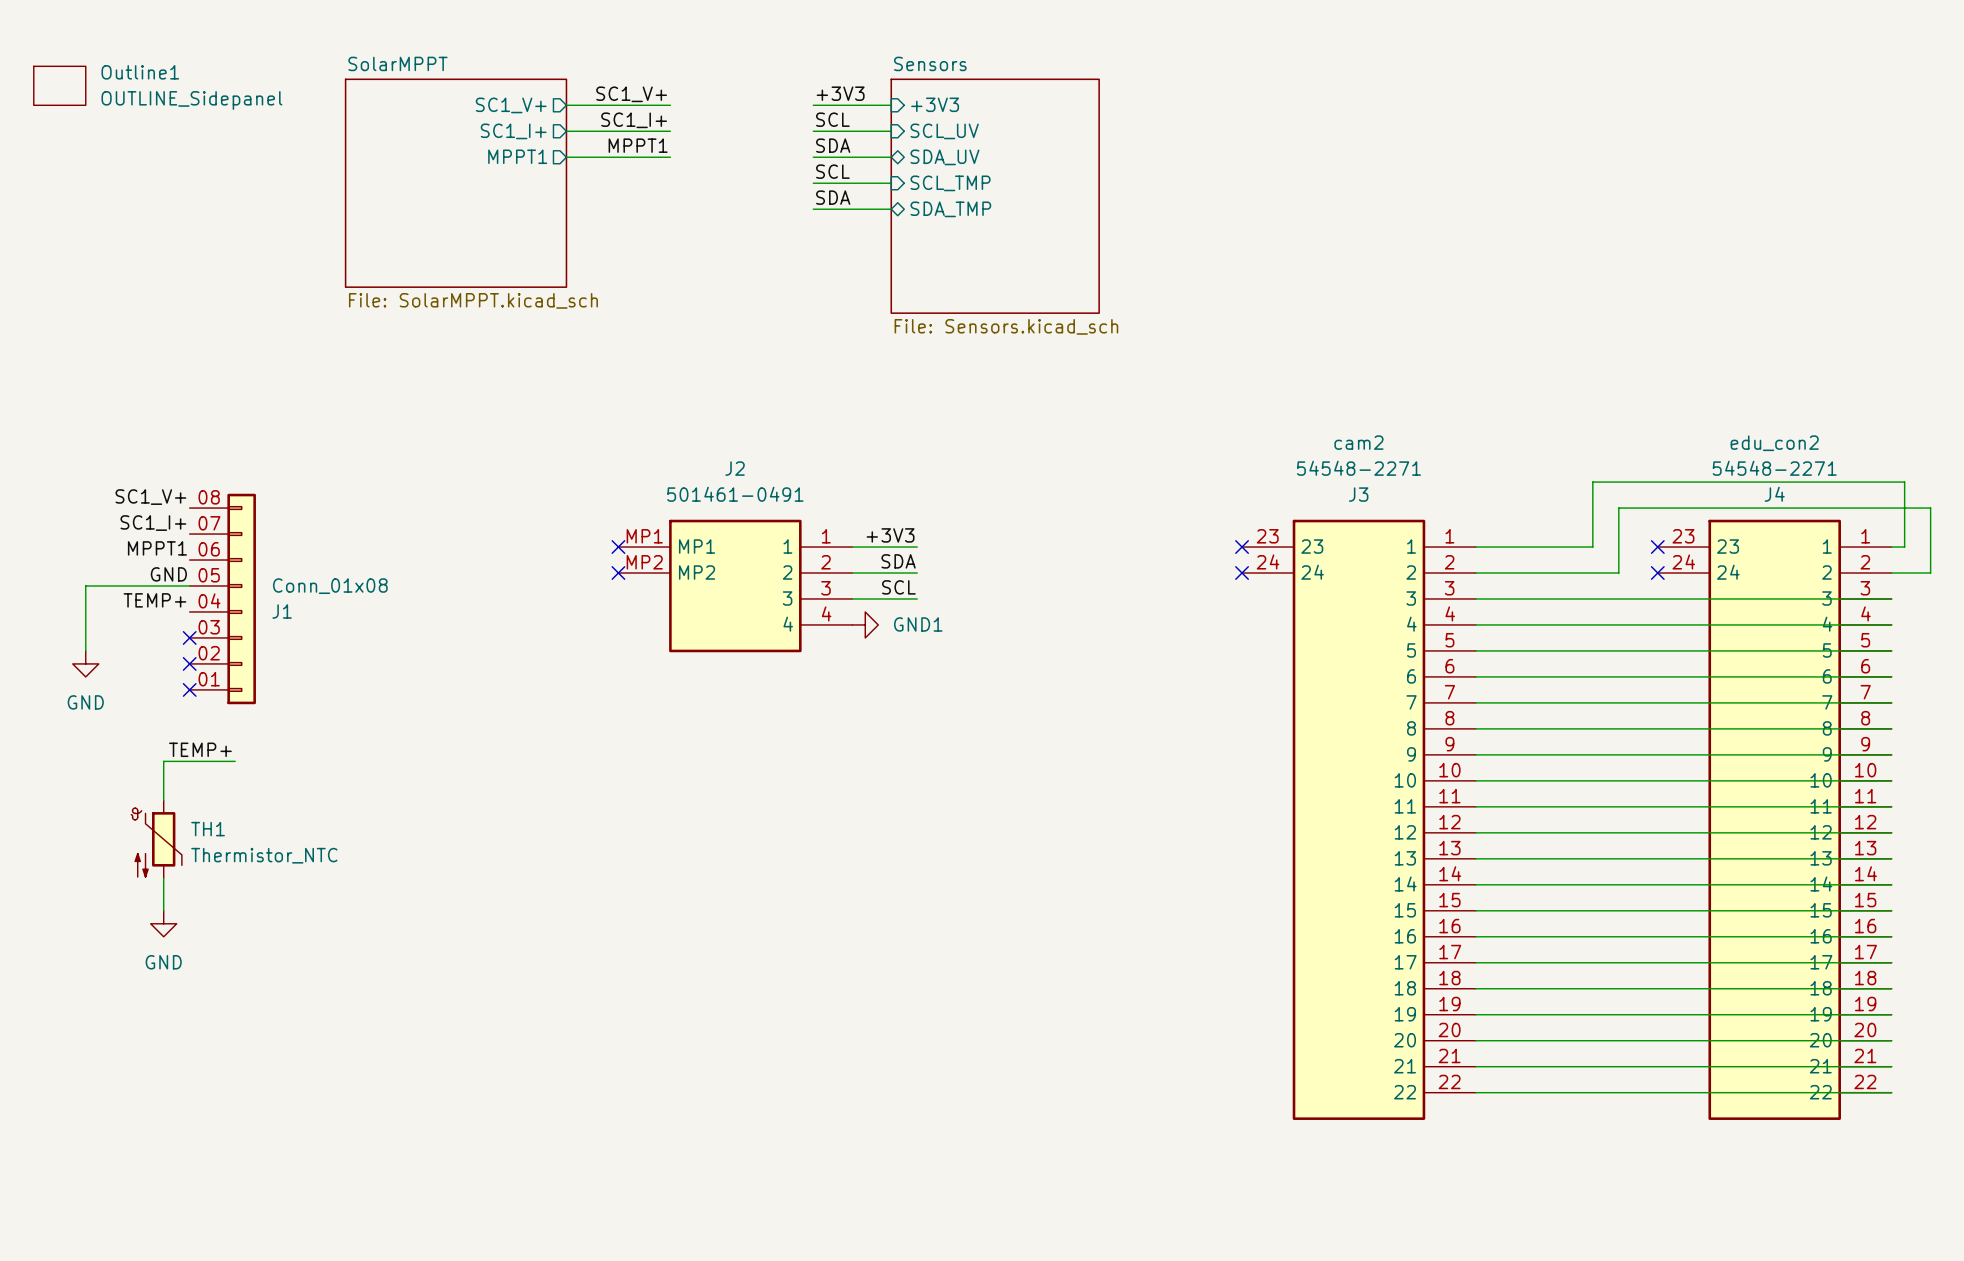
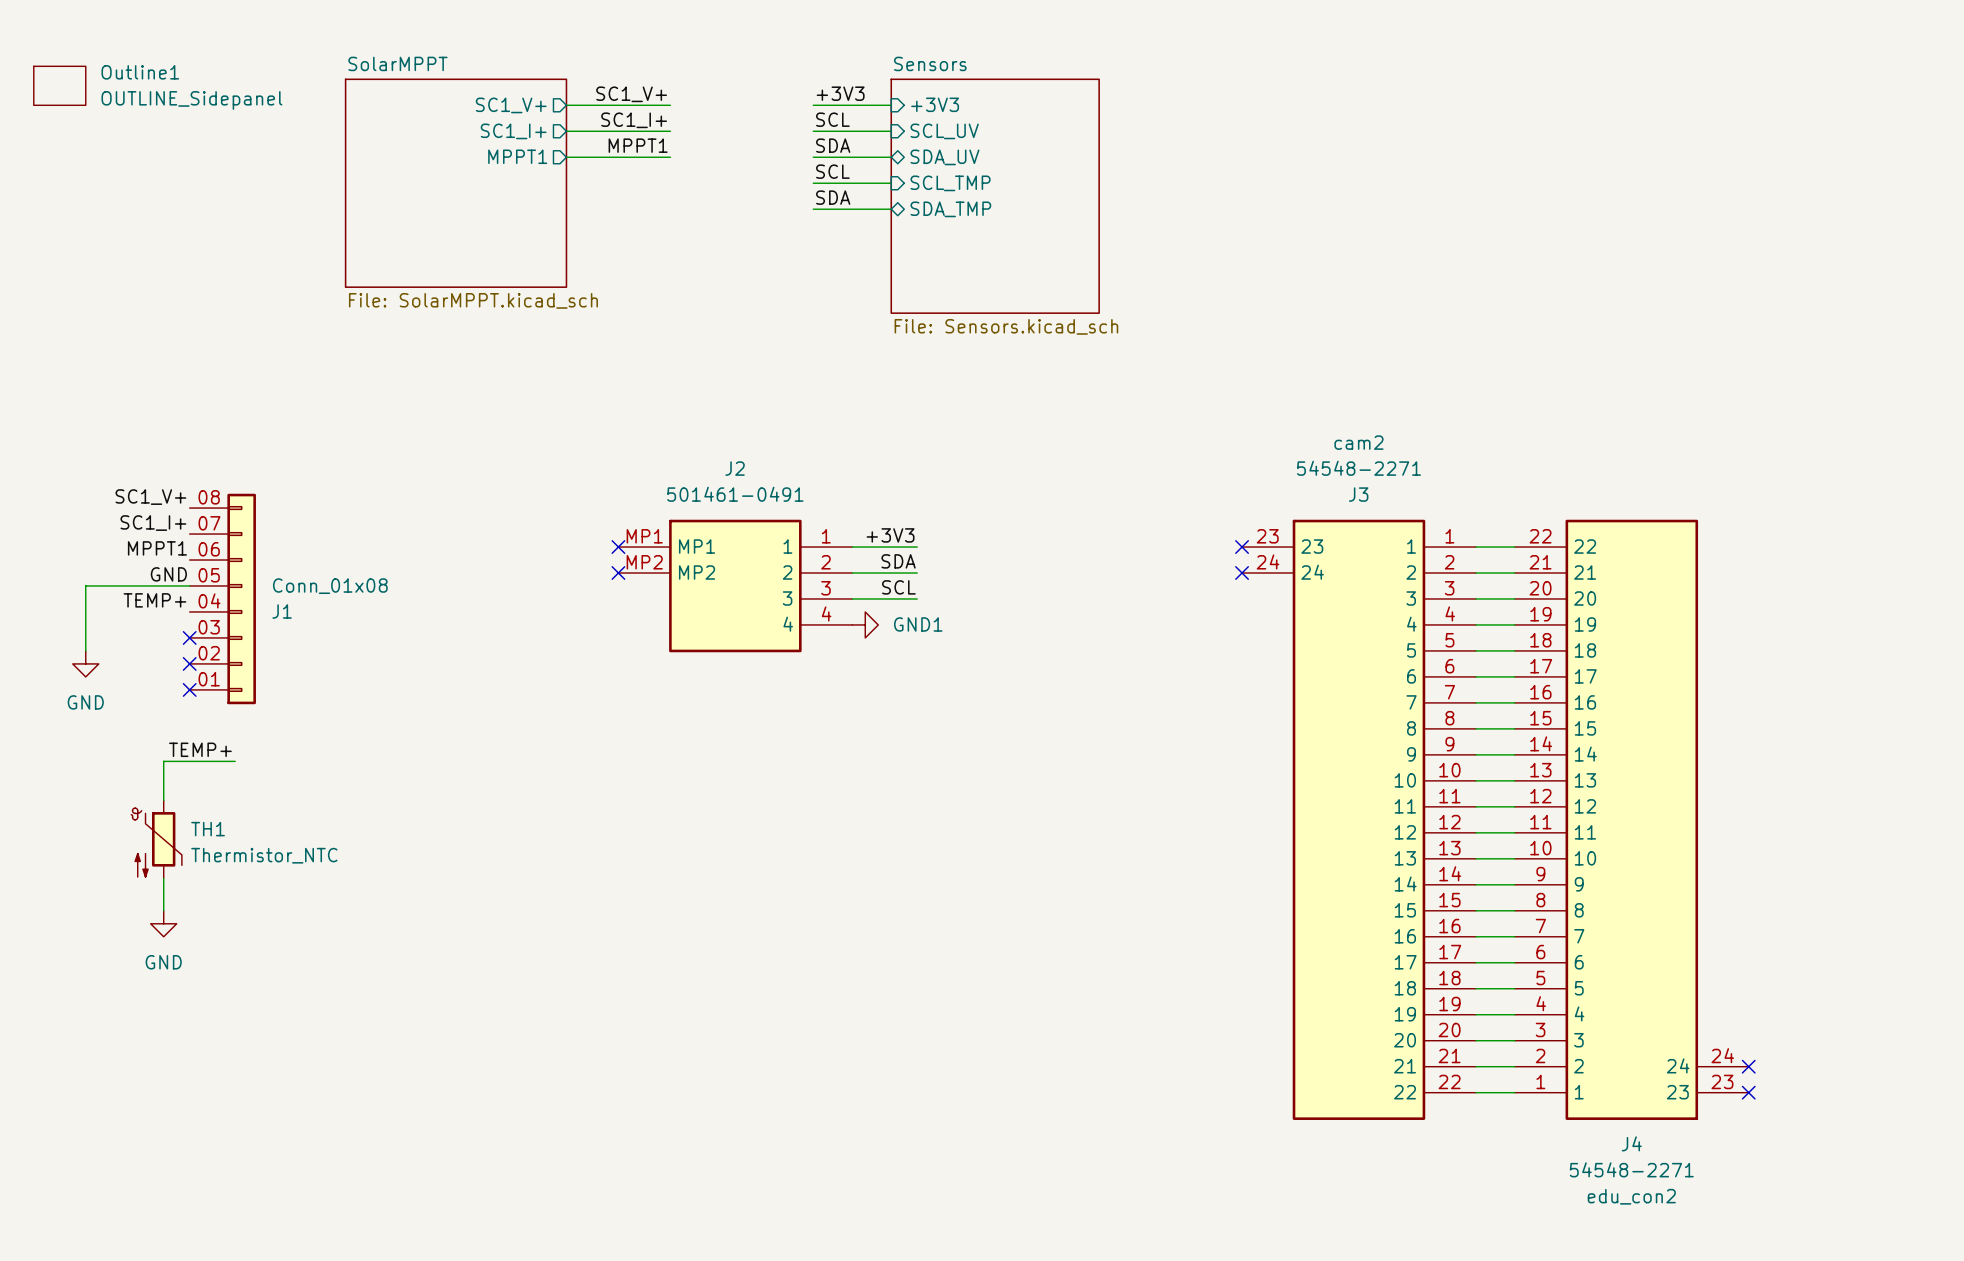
wire: (1514, 547) (1592, 547) (1592, 482) (1904, 482) (1904, 547) (1891, 547) -> none
no-connect mark: (1657, 547) -> none
wire: (1514, 573) (1618, 573) (1618, 508) (1930, 508) (1930, 573) (1891, 573) -> none
no-connect mark: (1657, 573) -> none
wire: (1514, 598) (1891, 598) -> none
wire: (1514, 624) (1891, 624) -> none
wire: (1514, 650) (1891, 650) -> none
wire: (1514, 676) (1891, 676) -> none
wire: (1514, 702) (1891, 702) -> none
wire: (1514, 728) (1891, 728) -> none
wire: (1514, 754) (1891, 754) -> none
wire: (1514, 780) (1891, 780) -> none
wire: (1514, 806) (1891, 806) -> none
edu_con2 rotation: 0° (1774, 819) -> 180° (1631, 819)
wire: (1514, 832) (1891, 832) -> none
wire: (1514, 858) (1891, 858) -> none
wire: (1514, 884) (1891, 884) -> none
wire: (1514, 910) (1891, 910) -> none
wire: (1514, 936) (1891, 936) -> none
wire: (1514, 962) (1891, 962) -> none
wire: (1514, 988) (1891, 988) -> none
wire: (1514, 1014) (1891, 1014) -> none
wire: (1514, 1040) (1891, 1040) -> none
no-connect mark: none -> (1748, 1066)
no-connect mark: none -> (1748, 1092)

